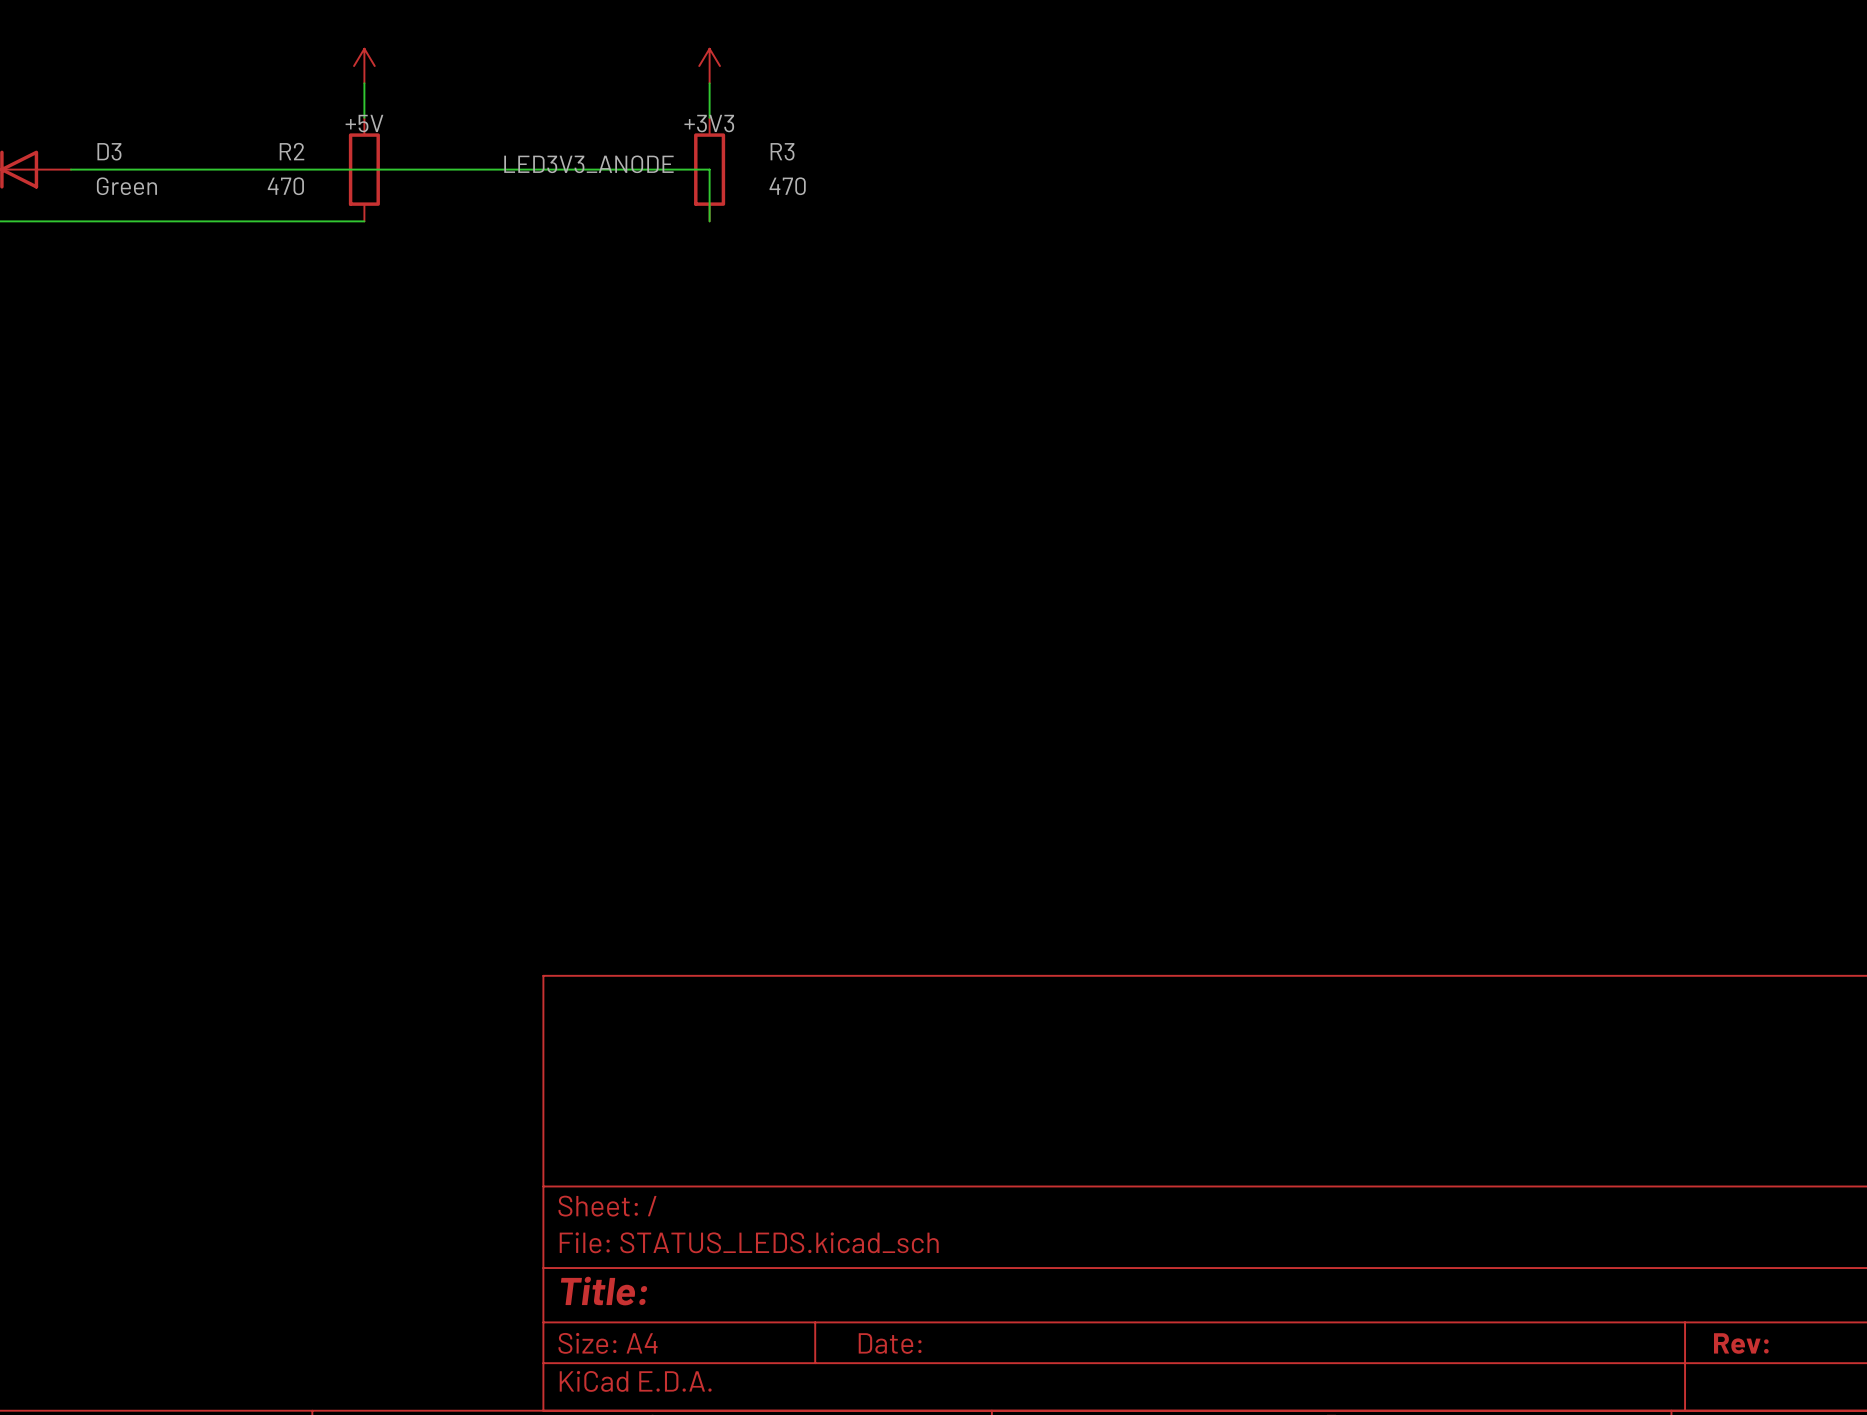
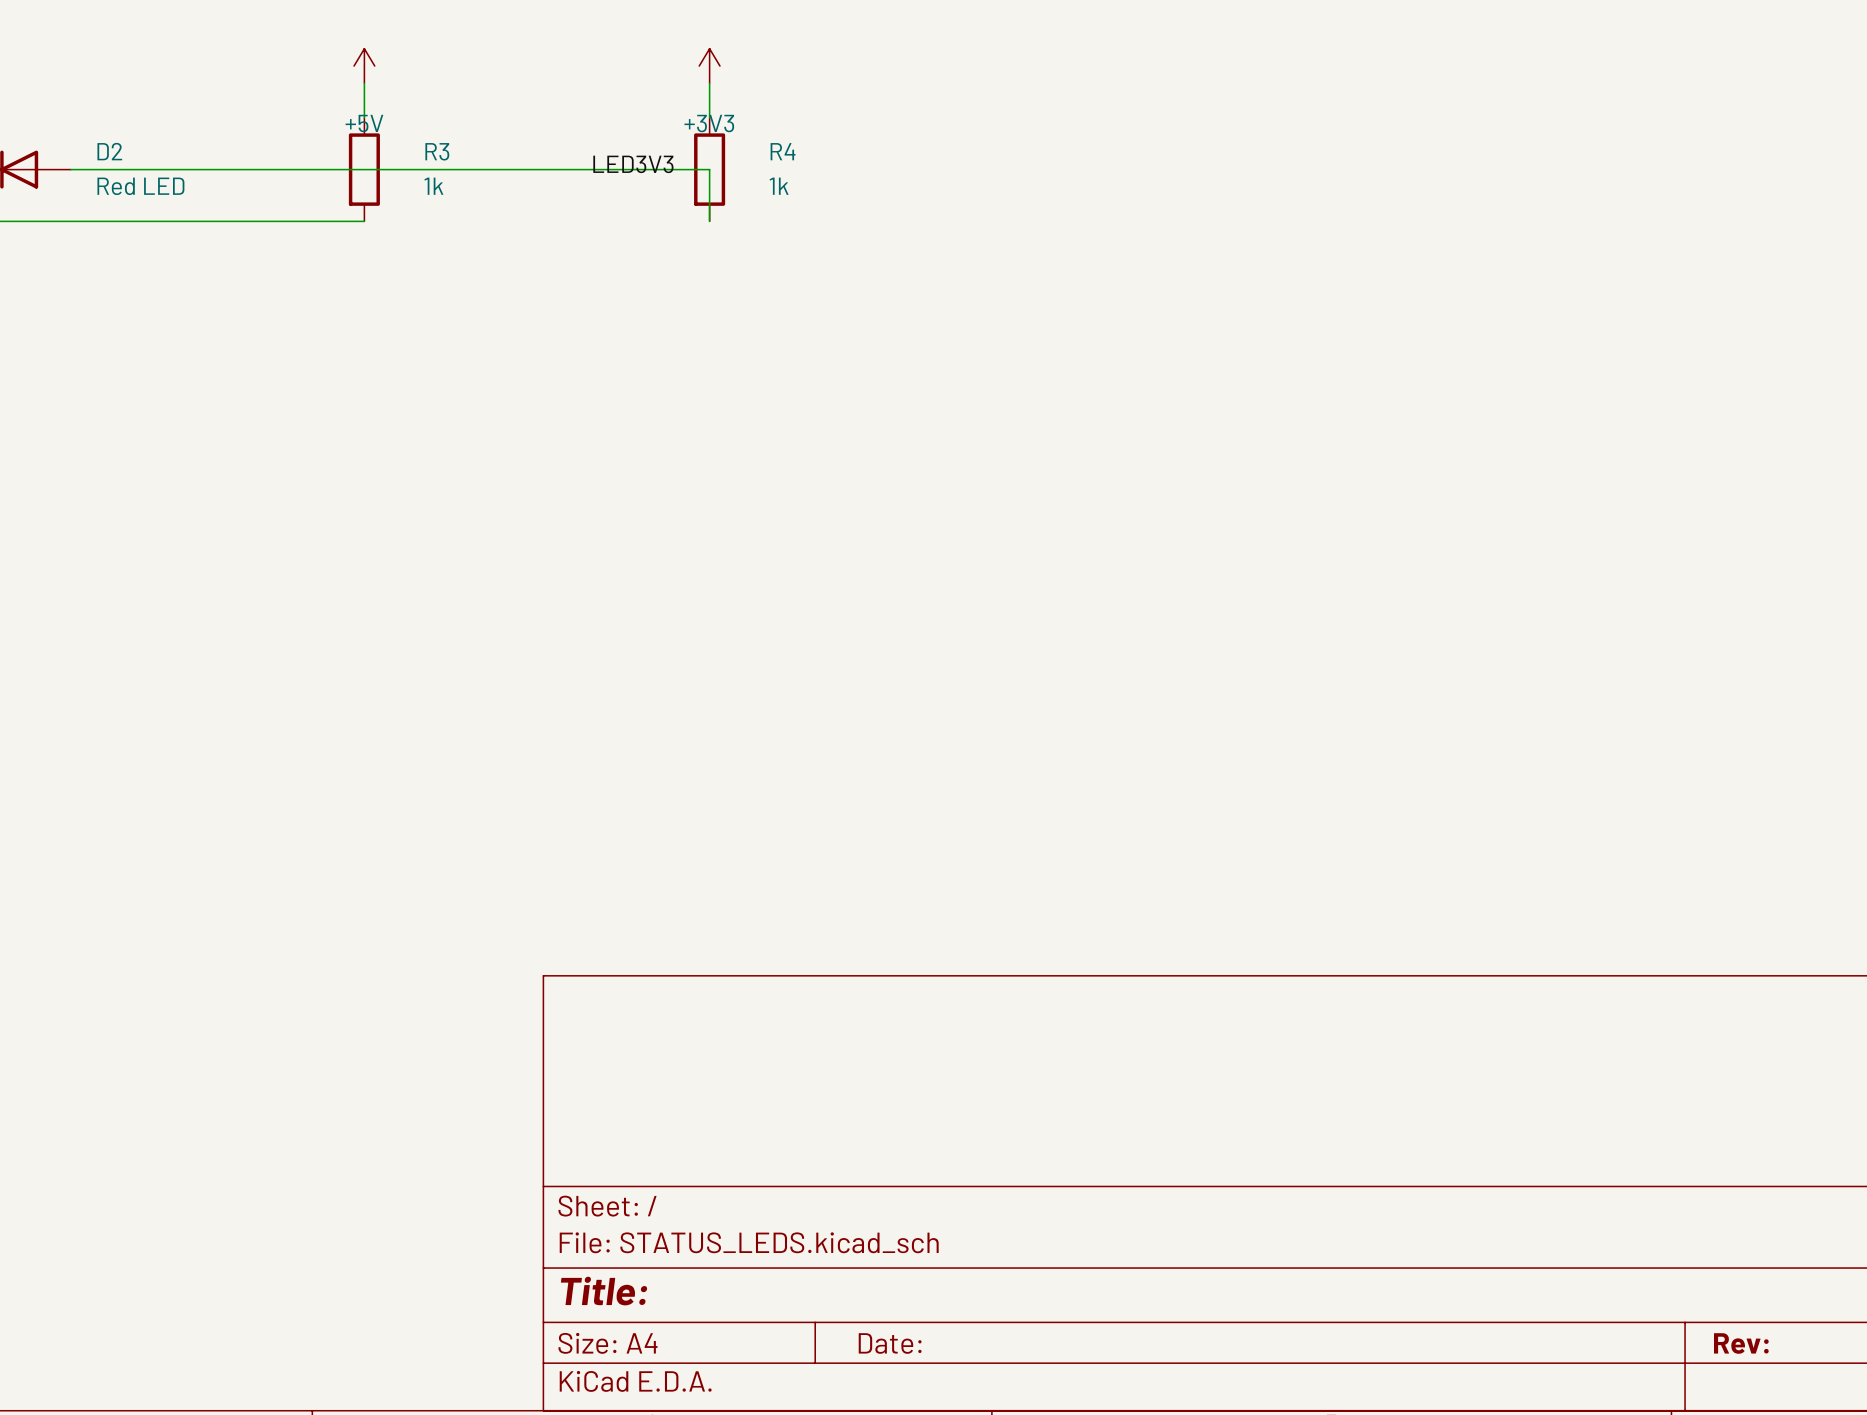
D3 name: D3 (109, 151) -> D2 (109, 151)
R2 name: R2 (292, 151) -> R3 (437, 151)
R3 name: R3 (782, 151) -> R4 (783, 151)
label: LED3V3_ANODE (588, 164) -> LED3V3 (633, 164)
D3 value: Green (126, 186) -> Red LED (140, 186)
R2 value: 470 (285, 186) -> 1k (433, 186)
R3 value: 470 (787, 186) -> 1k (779, 186)

